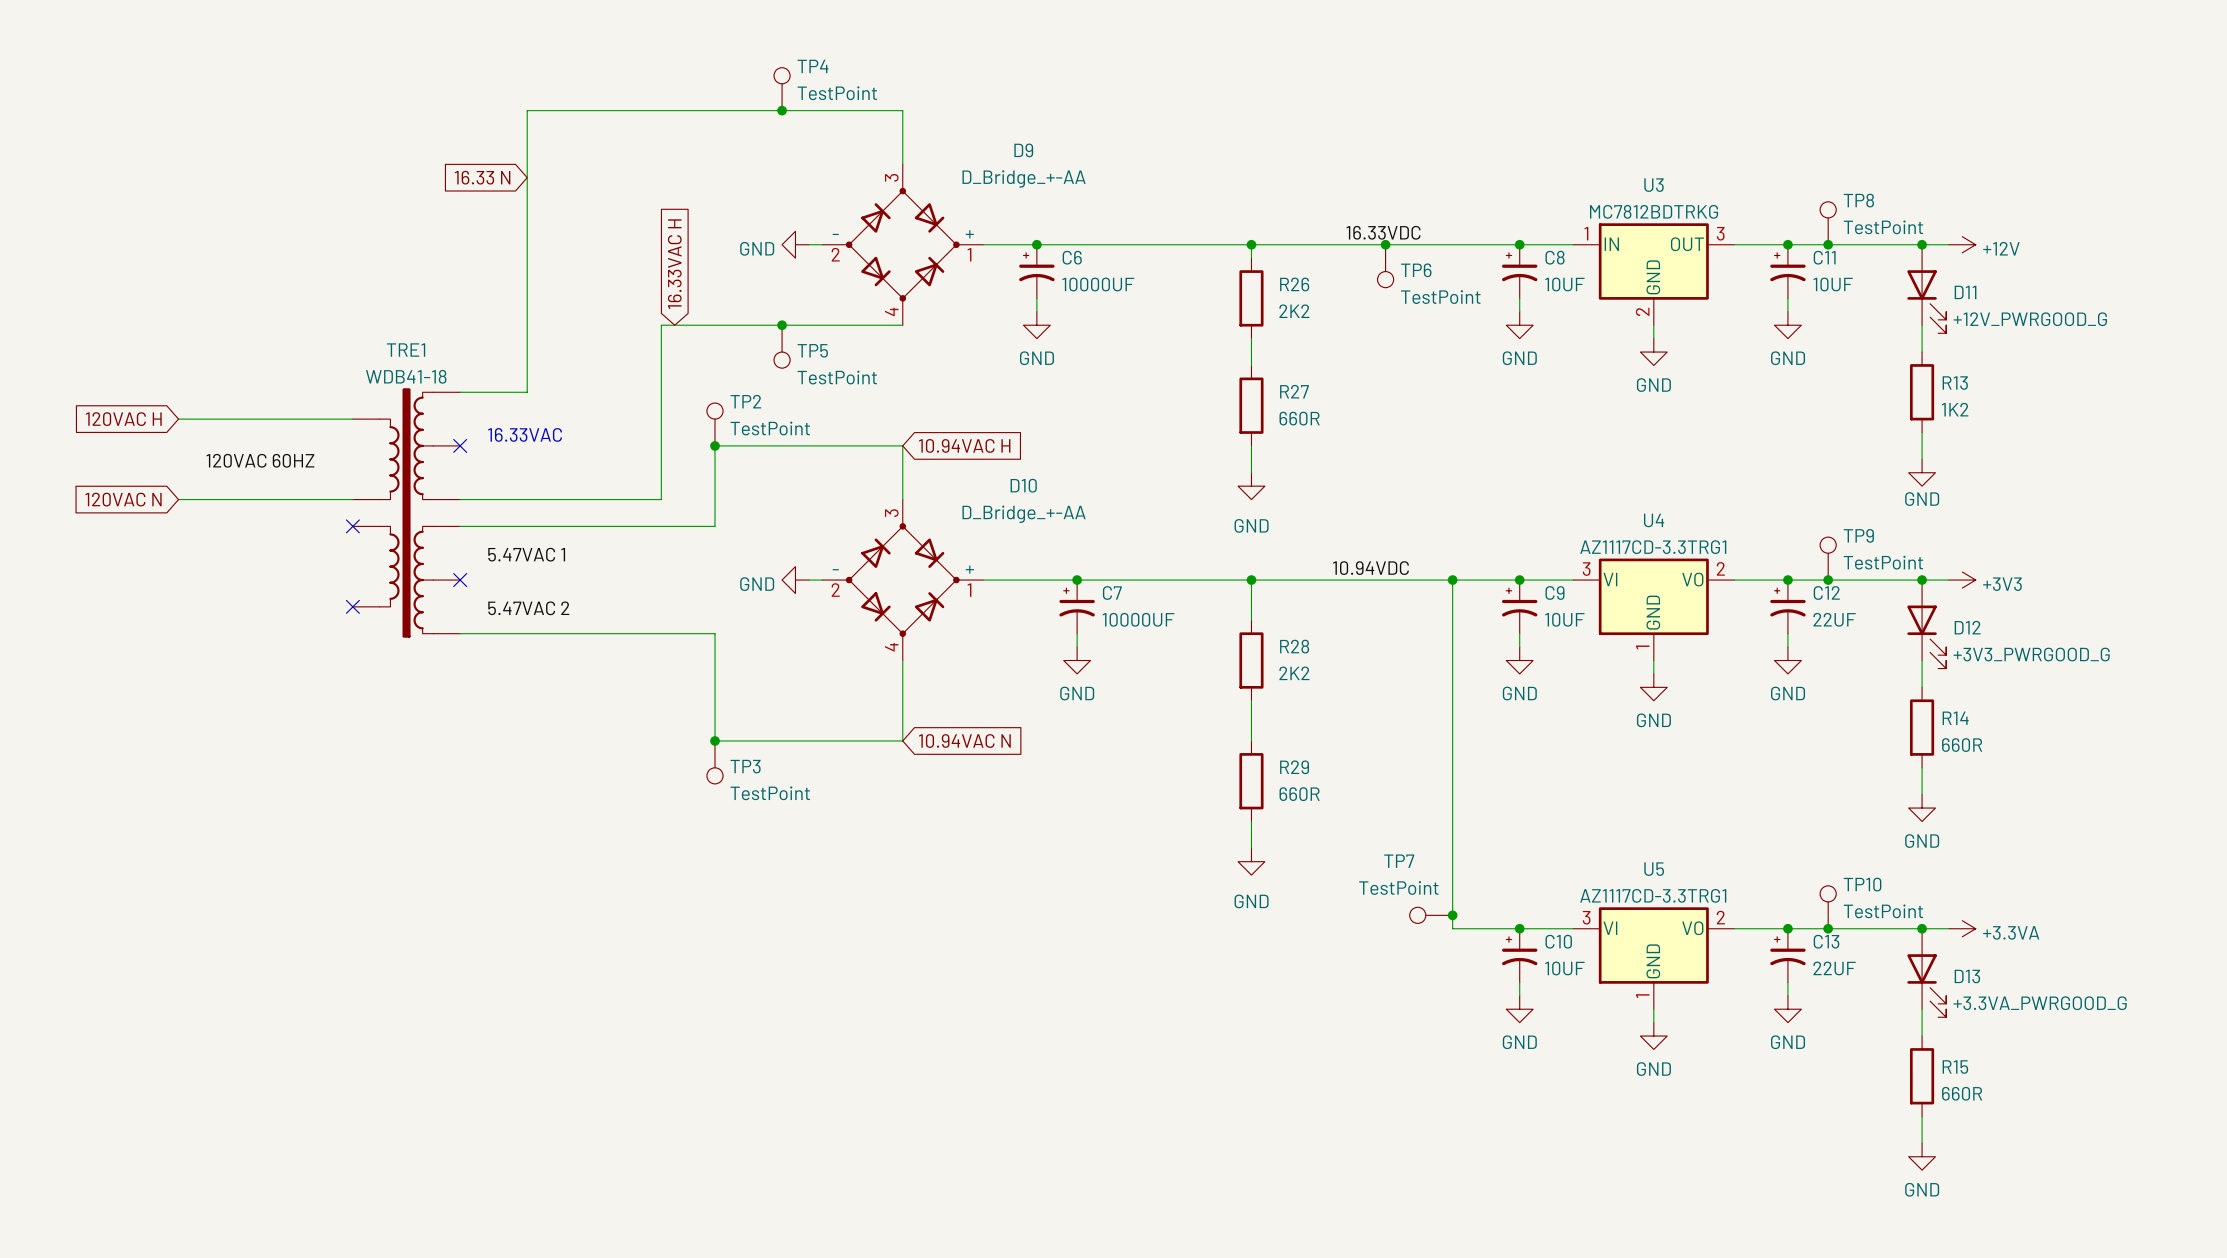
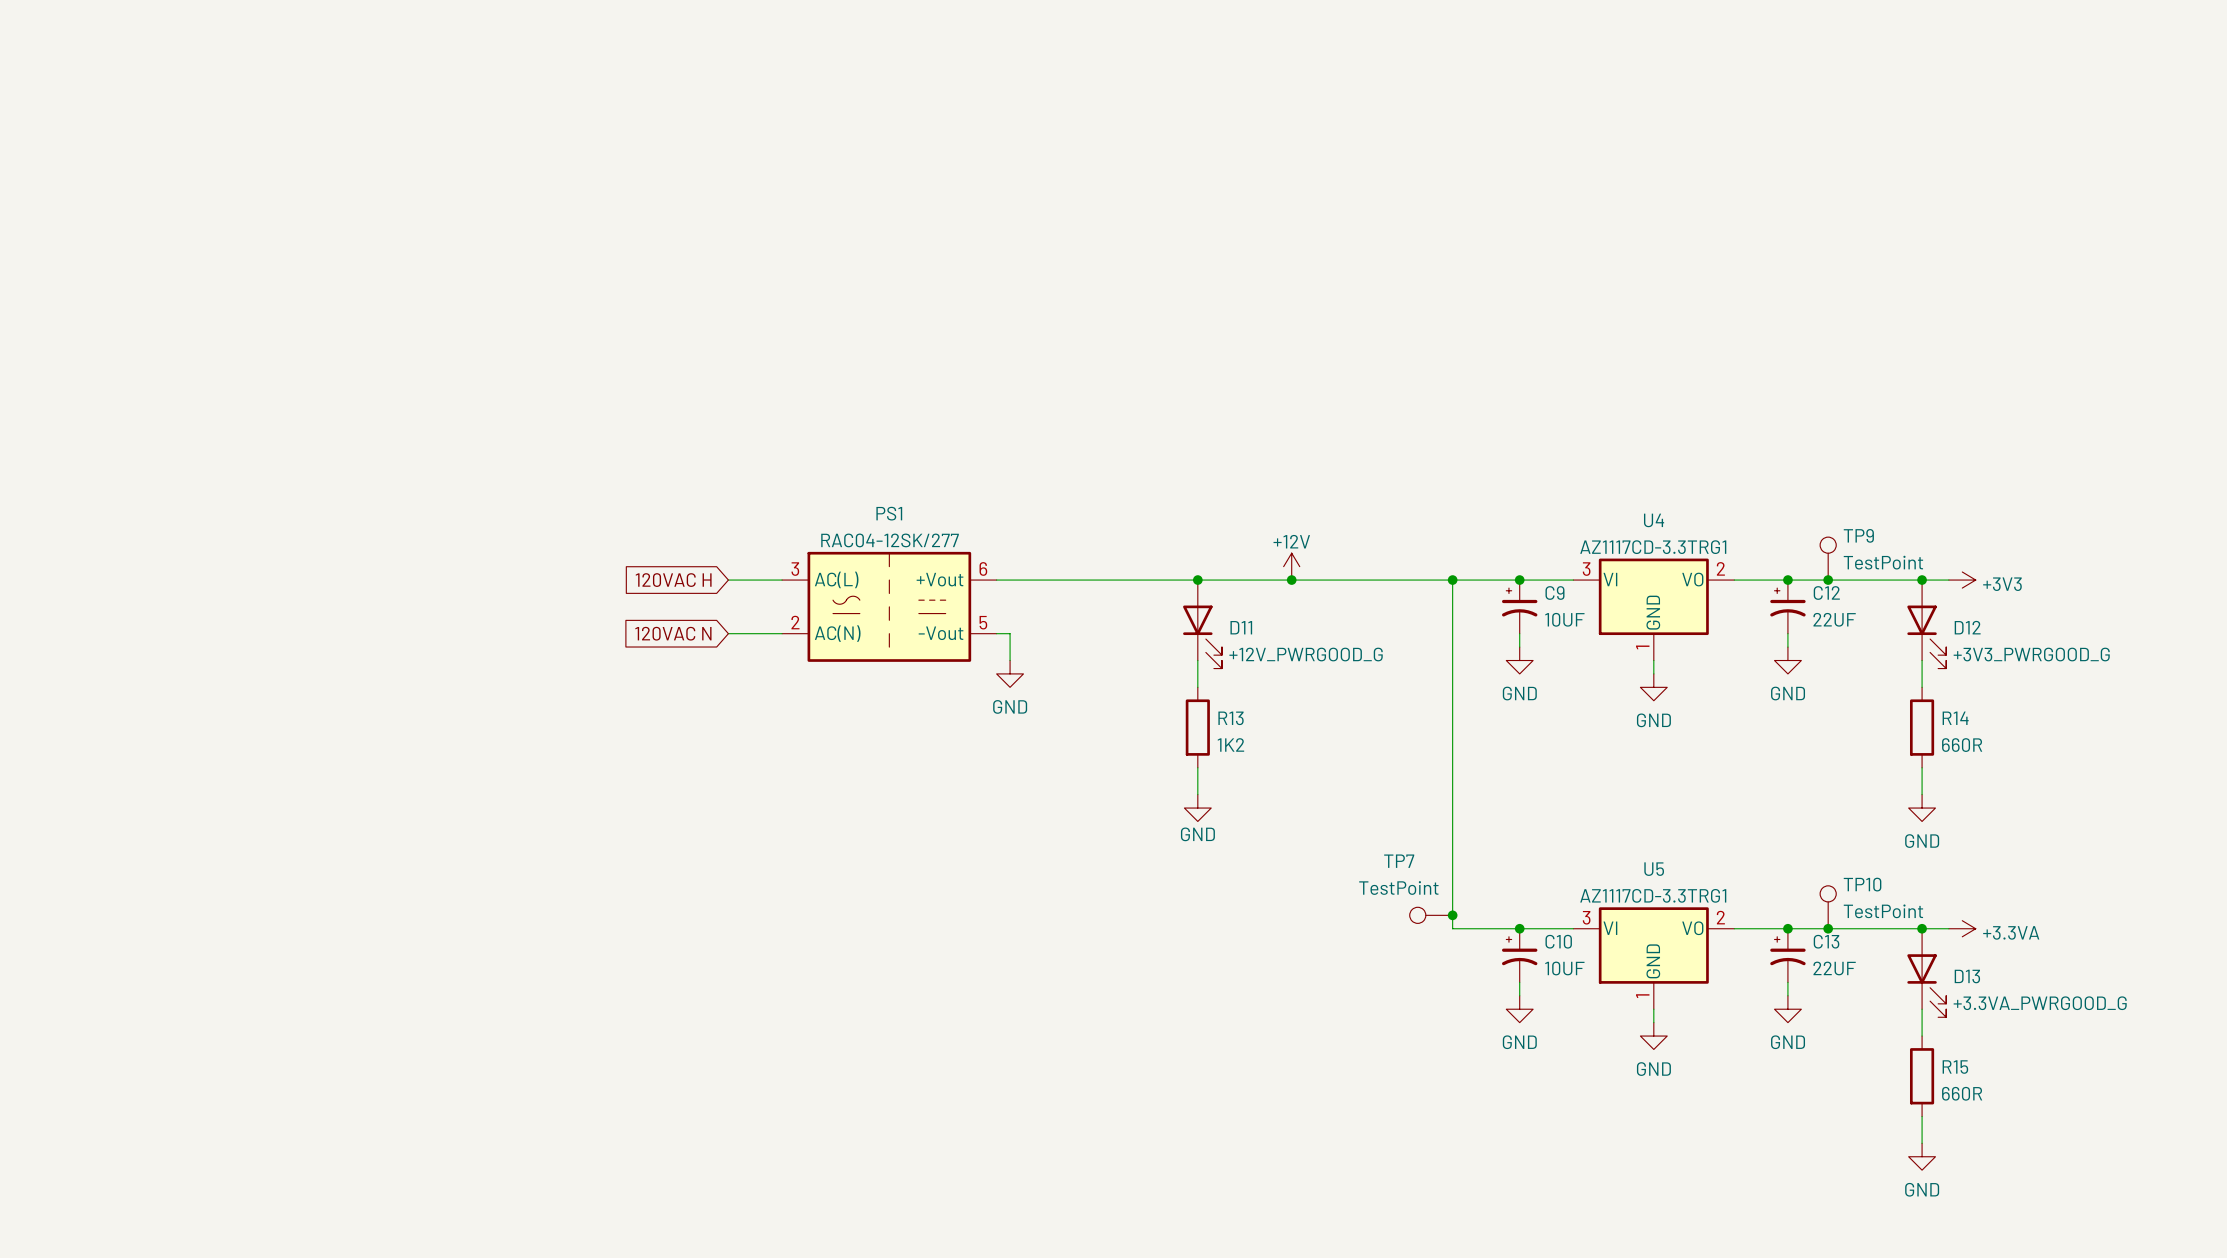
TP4: TestPoint (782, 89) -> none
junction: (782, 110) -> none
wire: (902, 164) (902, 110) (527, 110) (527, 392) (460, 392) -> none
global label: 16.33 N (482, 177) -> none
TP8: TestPoint (1828, 223) -> none
label: 16.33VDC (1383, 232) -> none
power symbol: GND (795, 244) -> none
wire: (808, 244) (822, 244) -> none
D9: D_Bridge_+-AA (902, 244) -> none
wire: (983, 244) (1573, 244) -> none
junction: (1036, 244) -> none
wire: (1251, 244) (1251, 258) -> none
junction: (1251, 244) -> none
junction: (1385, 244) -> none
junction: (1519, 244) -> none
wire: (1734, 244) (1948, 244) -> none
junction: (1787, 244) -> none
junction: (1828, 244) -> none
junction: (1922, 244) -> none
power symbol: +12V (1962, 244) -> none
global label: 16.33VAC H (674, 264) -> none
TP6: TestPoint (1385, 266) -> none
C6: 10000UF (1036, 271) -> none
C8: 10UF (1519, 271) -> none
C11: 10UF (1787, 271) -> none
U3: MC7812BDTRKG (1653, 274) -> none
D11 position: (1926, 289) -> (1202, 624)
wire: (1036, 298) (1036, 311) -> none
R26: 2K2 (1251, 298) -> none
wire: (1519, 298) (1519, 311) -> none
wire: (1787, 298) (1787, 311) -> none
junction: (782, 325) -> none
wire: (902, 325) (661, 325) (661, 499) (460, 499) -> none
power symbol: GND (1036, 325) -> none
power symbol: GND (1519, 325) -> none
wire: (1653, 325) (1653, 338) -> none
power symbol: GND (1787, 325) -> none
wire: (1922, 325) (1922, 352) -> none
wire: (1251, 338) (1251, 365) -> none
TP5: TestPoint (782, 346) -> none
power symbol: GND (1653, 352) -> none
R13 position: (1922, 392) -> (1197, 727)
R27: 660R (1251, 405) -> none
global label: 120VAC H (123, 419) -> none
wire: (178, 419) (352, 419) -> none
TP2: TestPoint (715, 424) -> none
wire: (1922, 432) (1922, 459) -> none
text: 16.33VAC (525, 434) -> none
no-connect mark: (460, 445) -> none
junction: (715, 445) -> none
global label: 10.94VAC H (964, 445) -> none
wire: (1251, 445) (1251, 472) -> (1197, 660) (1197, 687)
label: 120VAC 60HZ (260, 460) -> none
power symbol: GND (1922, 472) -> none
power symbol: GND (1251, 486) -> none
global label: 120VAC N (123, 499) -> none
wire: (178, 499) (352, 499) -> none
wire: (902, 499) (902, 445) (715, 445) (715, 526) (460, 526) -> none
TRE1: WDB41-18 (406, 512) -> none
no-connect mark: (352, 526) -> none
label: 5.47VAC 1 (526, 554) -> none
power symbol: none -> +12V (1291, 566)
label: 10.94VDC (1370, 568) -> none
no-connect mark: (460, 580) -> none
global label: none -> 120VAC H (673, 580)
wire: none -> (728, 580) (782, 580)
power symbol: GND (795, 580) -> none
D10: D_Bridge_+-AA (902, 580) -> none
junction: (1077, 580) -> none
junction: none -> (1197, 580)
wire: (1251, 580) (1251, 620) -> none
junction: (1251, 580) -> none
junction: none -> (1291, 580)
no-connect mark: (352, 606) -> none
PS1: none -> RAC04-12SK/277 (889, 606)
C7: 10000UF (1077, 606) -> none
label: 5.47VAC 2 (528, 608) -> none
wire: (460, 633) (715, 633) (715, 740) (902, 740) (902, 660) -> none
global label: none -> 120VAC N (673, 633)
wire: none -> (728, 633) (782, 633)
wire: none -> (996, 633) (1010, 633) (1010, 660)
wire: (1077, 633) (1077, 647) -> none
power symbol position: GND (1077, 660) -> GND (1010, 673)
R28: 2K2 (1251, 660) -> none
wire: (1251, 700) (1251, 740) -> none
junction: (715, 740) -> none
global label: 10.94VAC N (964, 740) -> none
TP3: TestPoint (715, 762) -> none
R29: 660R (1251, 781) -> none
wire: (1251, 821) (1251, 848) -> (1197, 767) (1197, 794)
power symbol position: GND (1251, 861) -> GND (1197, 808)
power symbol text position: GND (1251, 901) -> GND (1197, 834)

